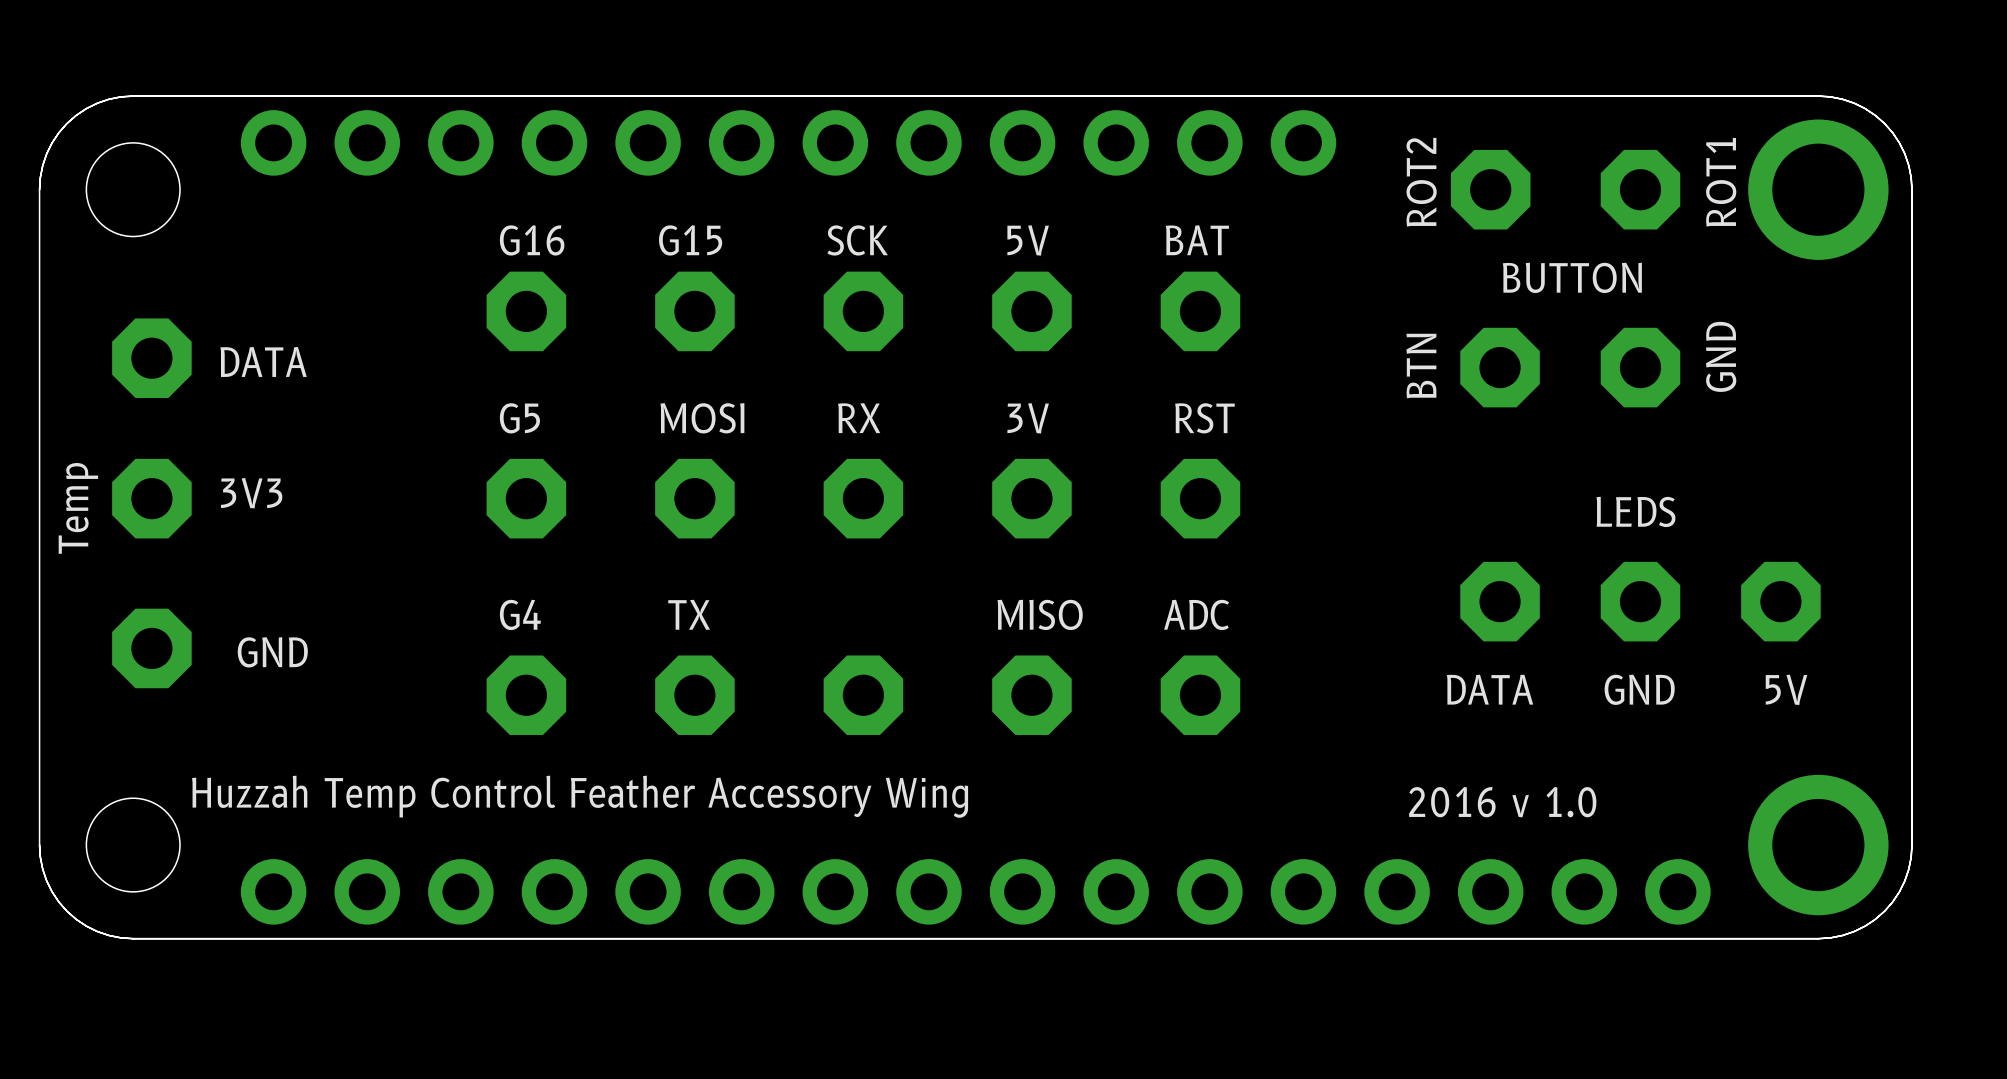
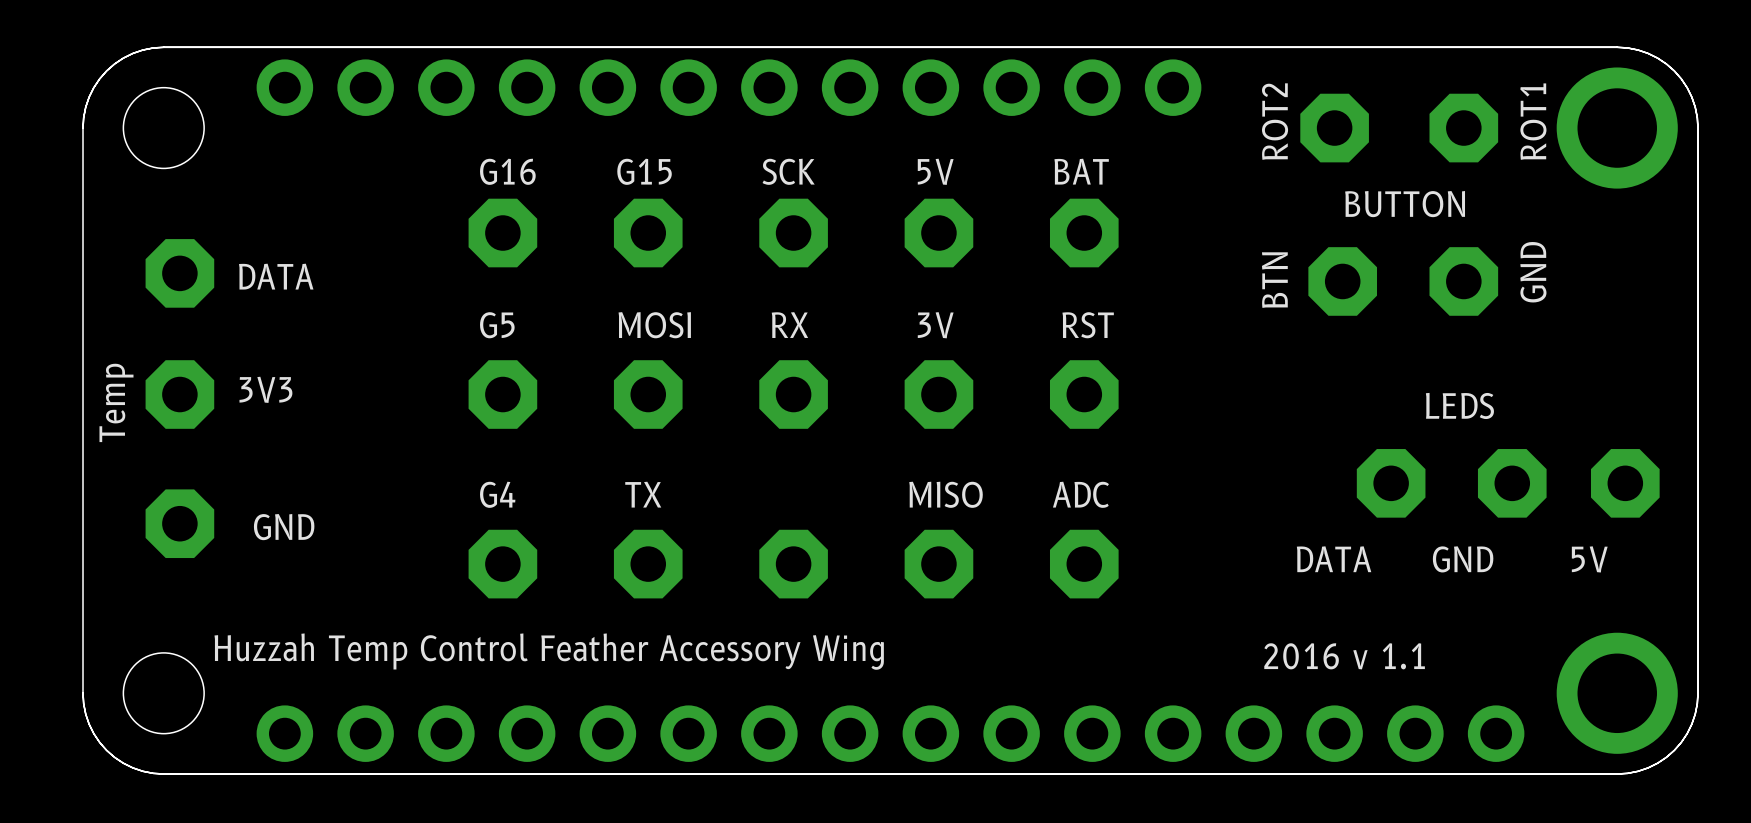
part: (1500, 601) -> none
part: none -> (1391, 483)
part: (1640, 601) -> none
part: none -> (1512, 483)
part: (1780, 601) -> none
part: none -> (1625, 483)
text: 2016 v 1.0 (1502, 802) -> 2016 v 1.1 (1344, 656)

